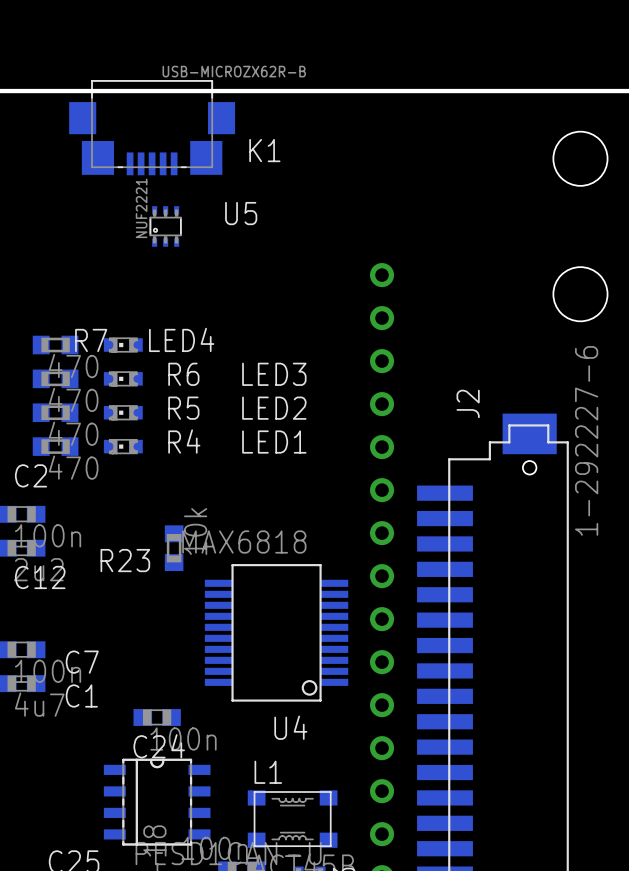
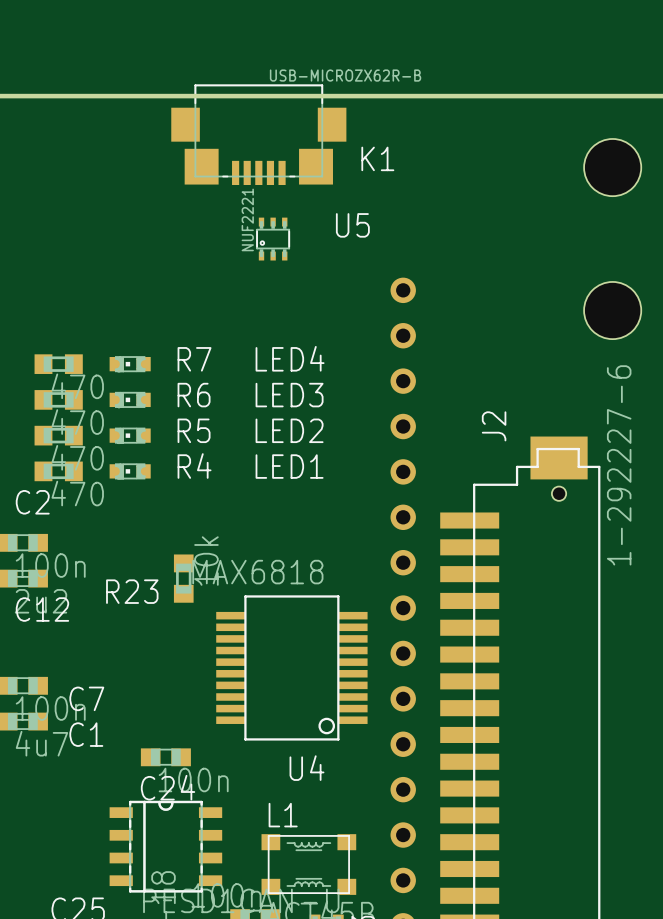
K1 position: (152, 127) -> (258, 134)
U5 position: (165, 226) -> (273, 239)
LED4 name position: LED4 (181, 339) -> LED4 (290, 358)
R7 name position: R7 (91, 340) -> R7 (194, 359)

